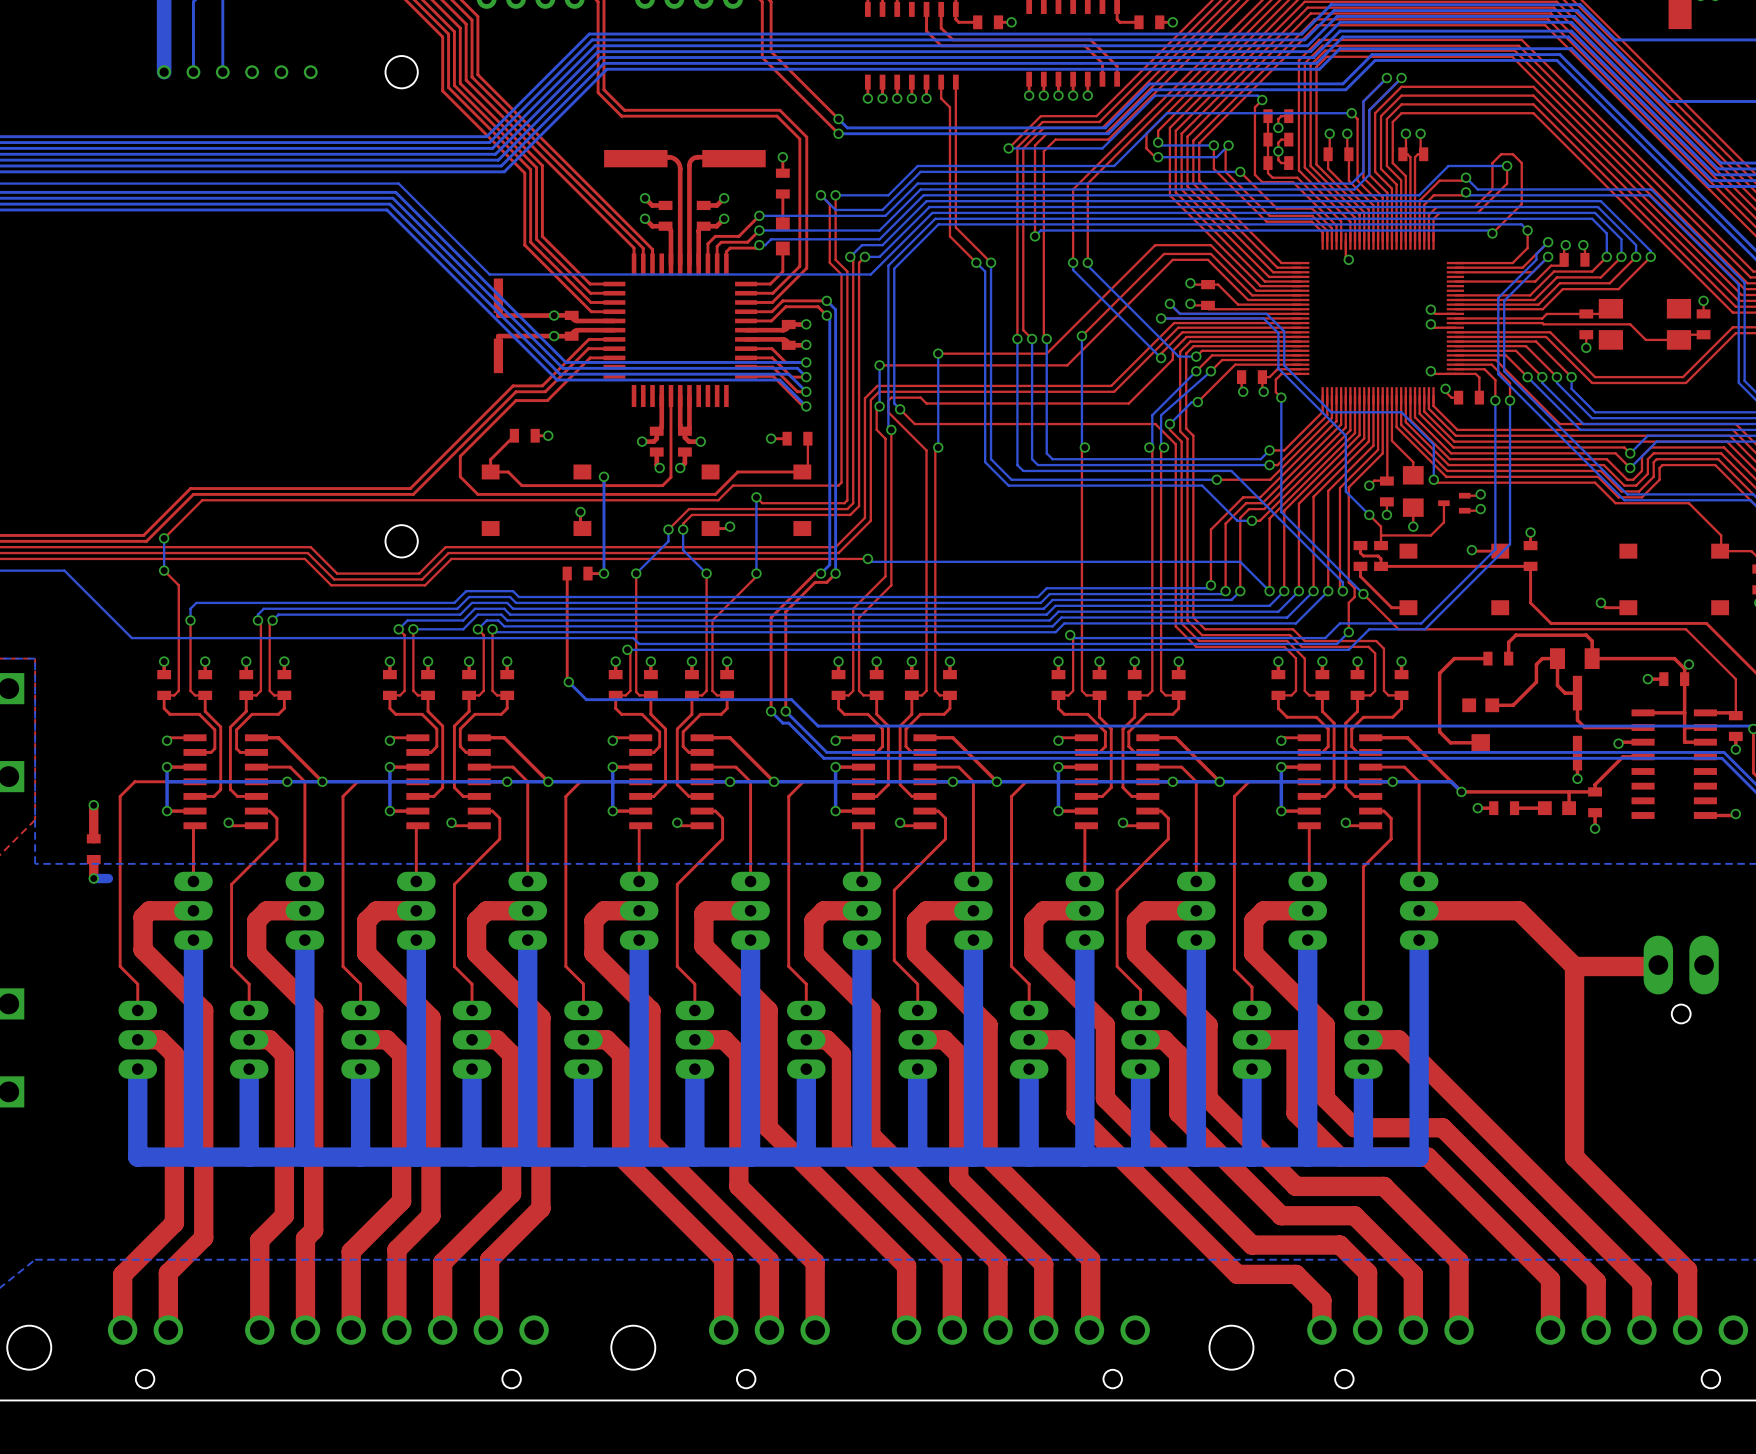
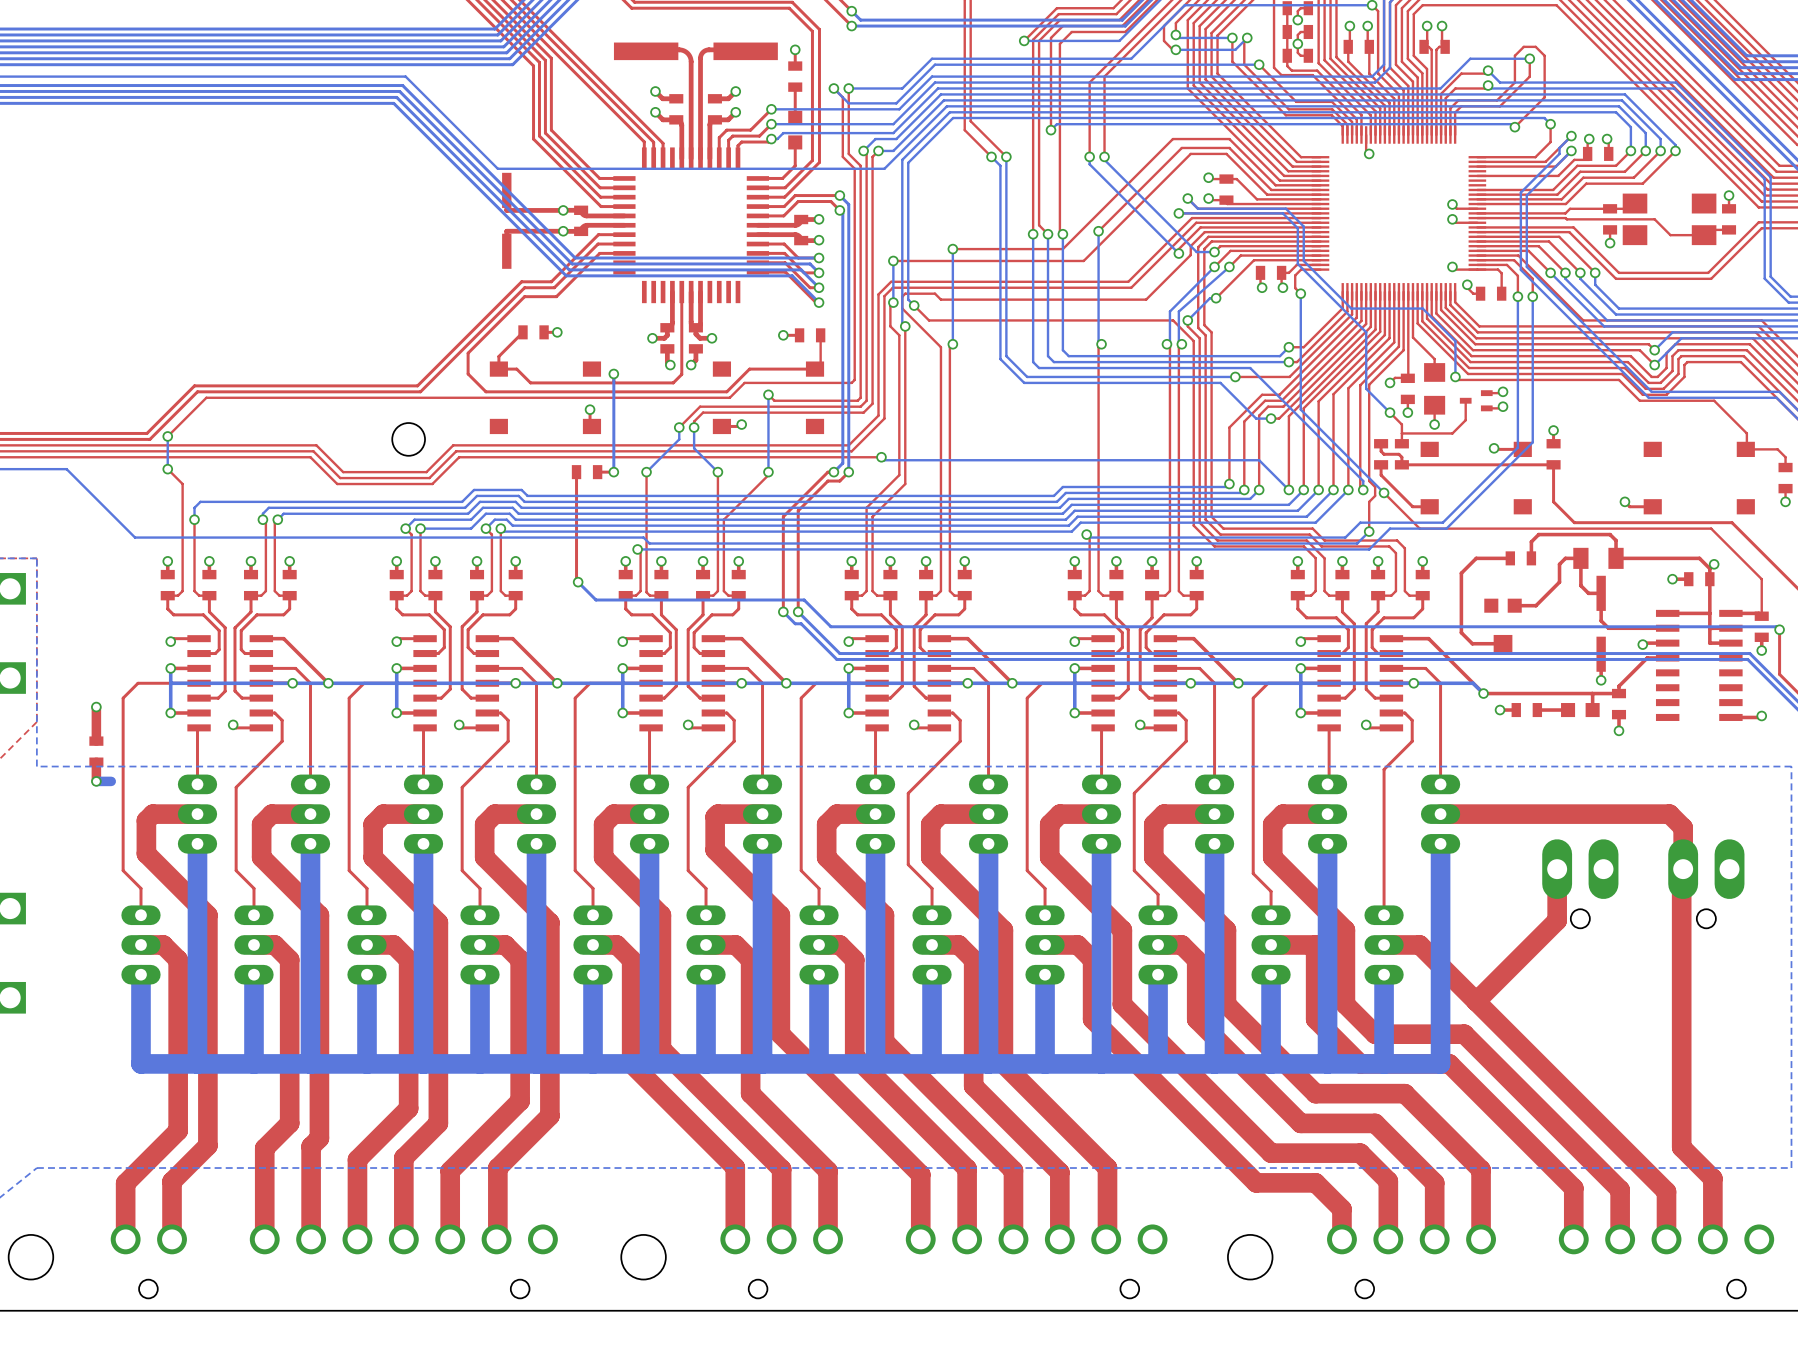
top track: (1518, 910) (1574, 966) -> (1541, 814) (1669, 814) (1683, 827) (1683, 869)
top track: none -> (1557, 869) (1557, 920) (1476, 1001)
top track: (1574, 966) (1574, 1157) (1656, 1239) -> (1681, 870) (1681, 1147)
top track: (1656, 966) (1574, 966) -> none
part: none -> (1580, 883)

